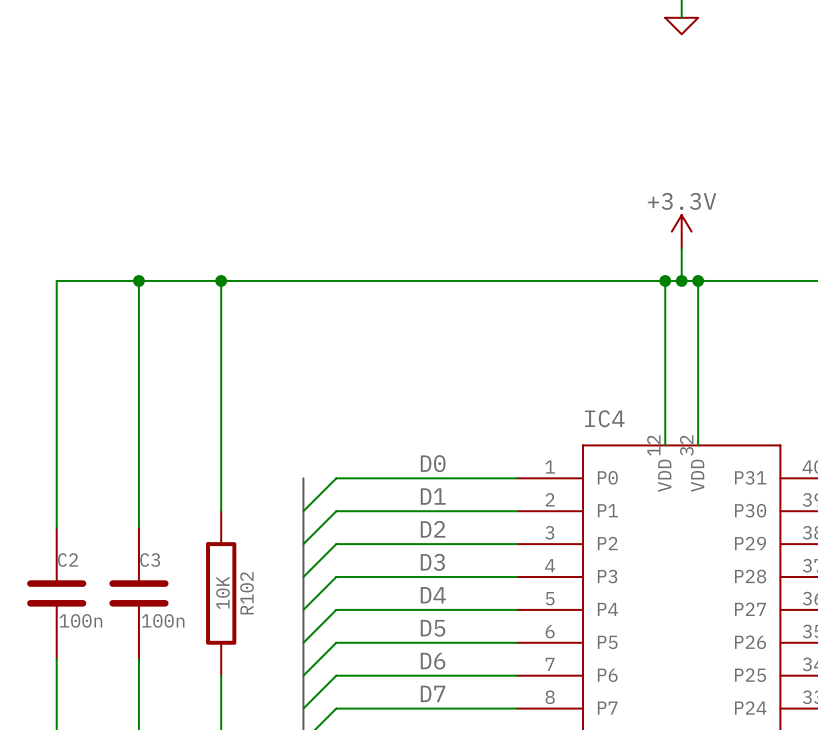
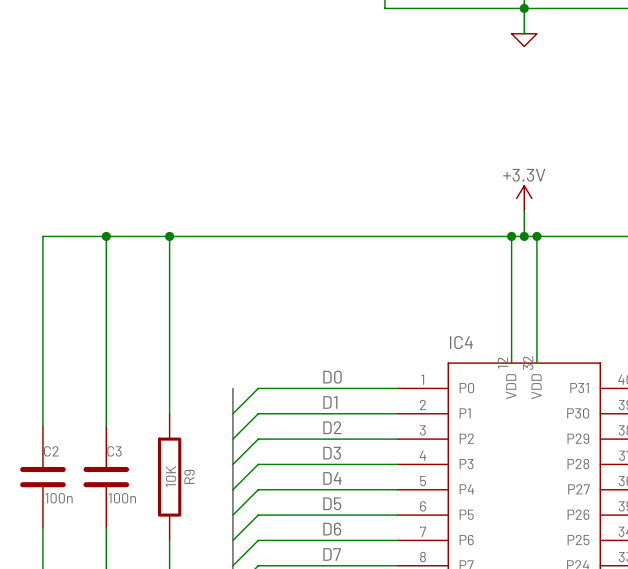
R102 name: R102 (247, 593) -> R9 (189, 476)

